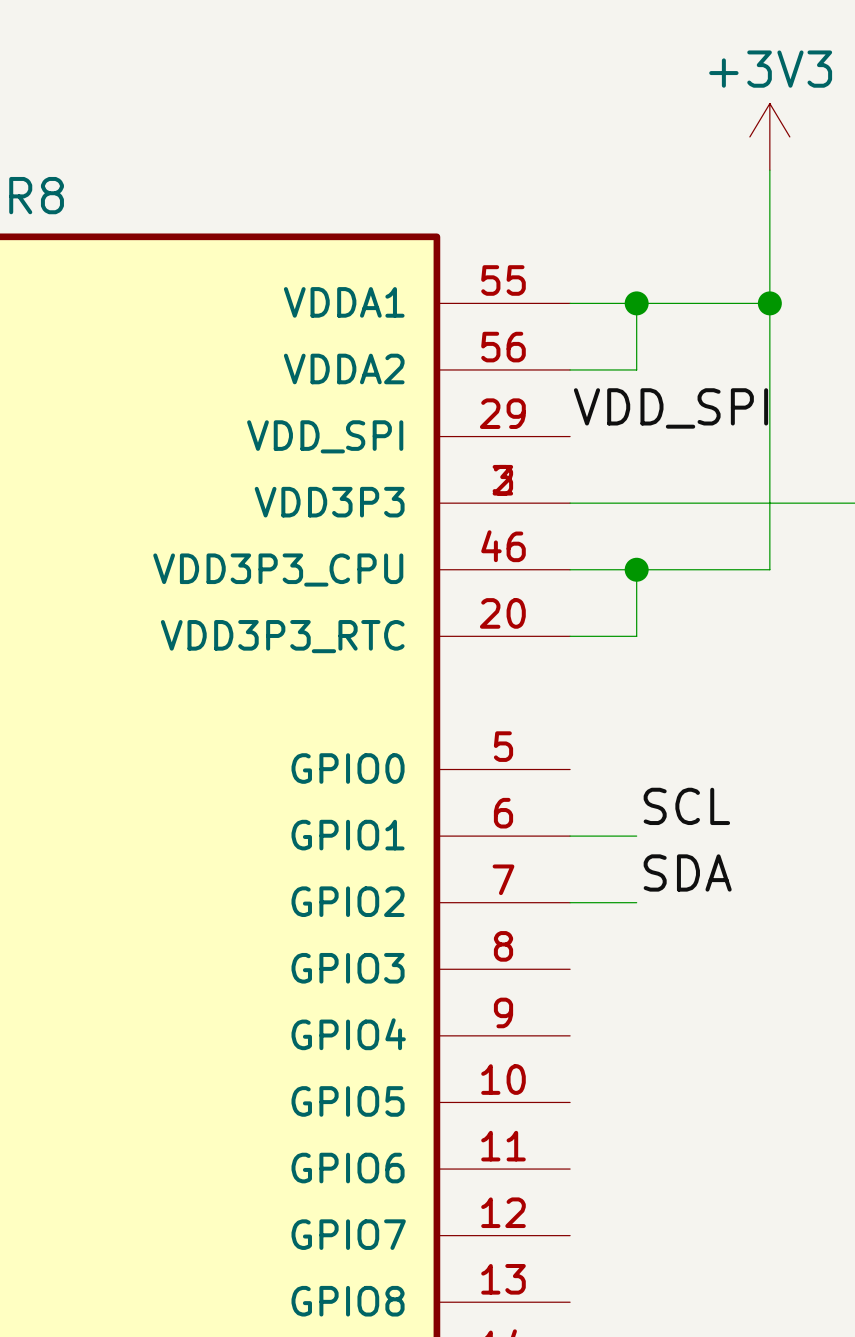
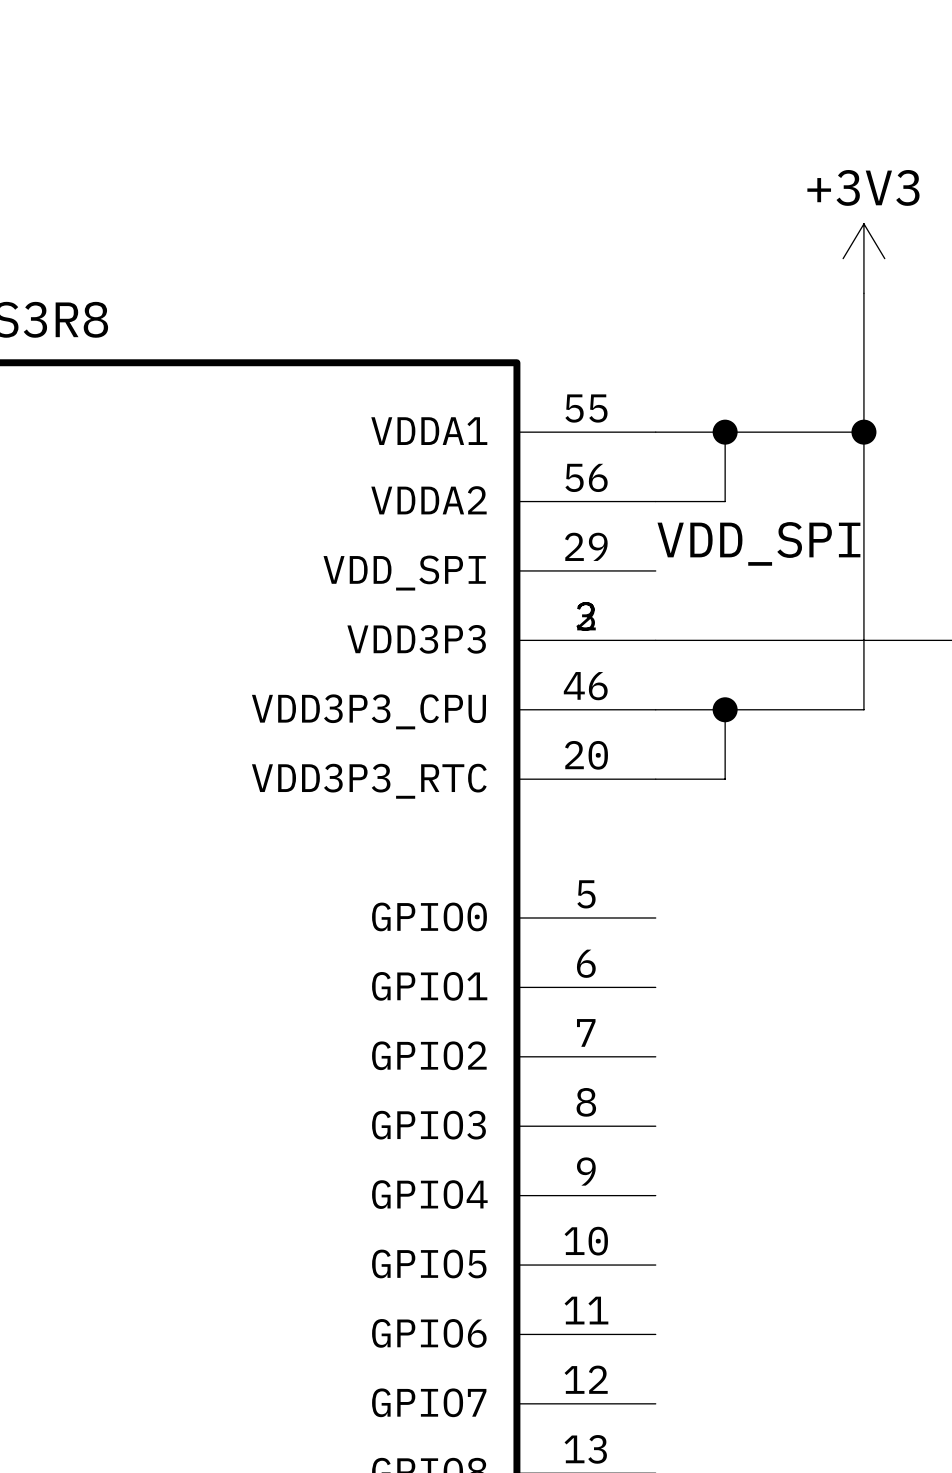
label: SCL (686, 806) -> none
wire: (570, 836) (636, 836) -> none
label: SDA (687, 872) -> none
wire: (570, 902) (636, 902) -> none

